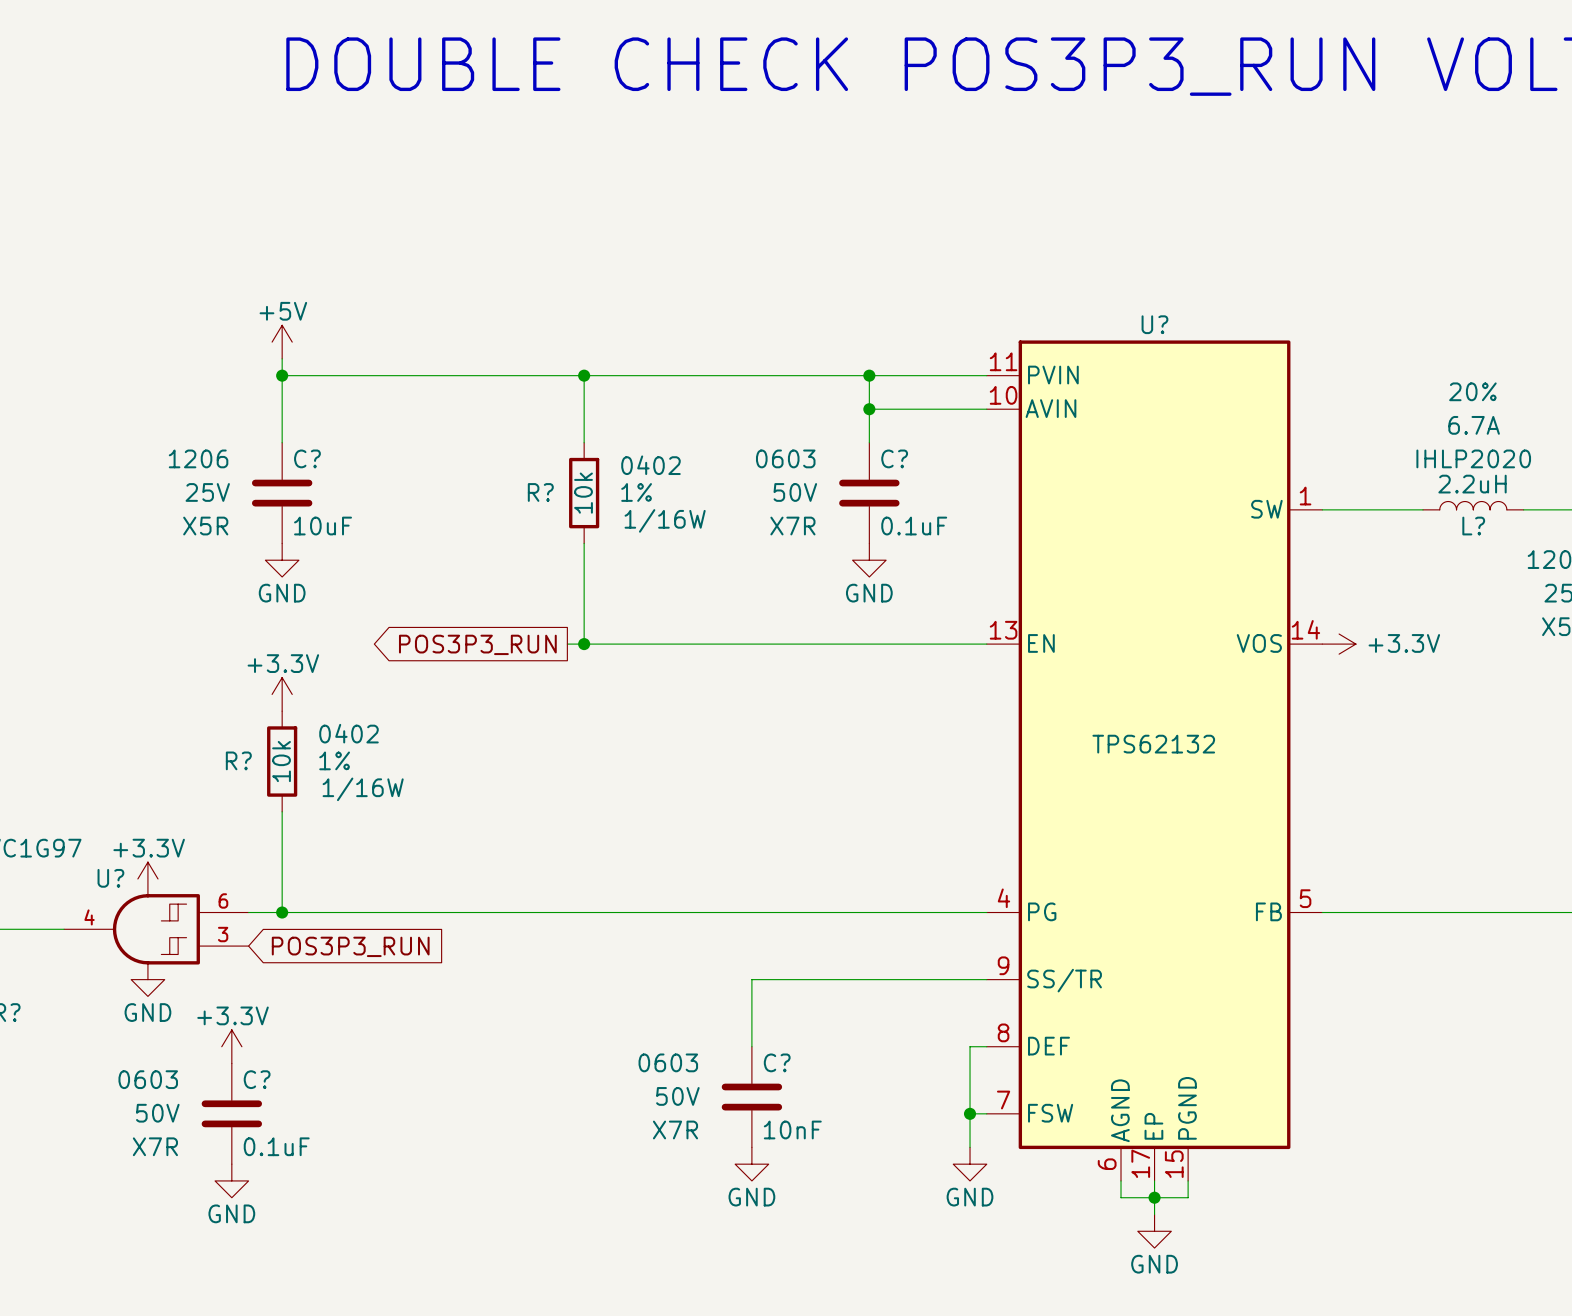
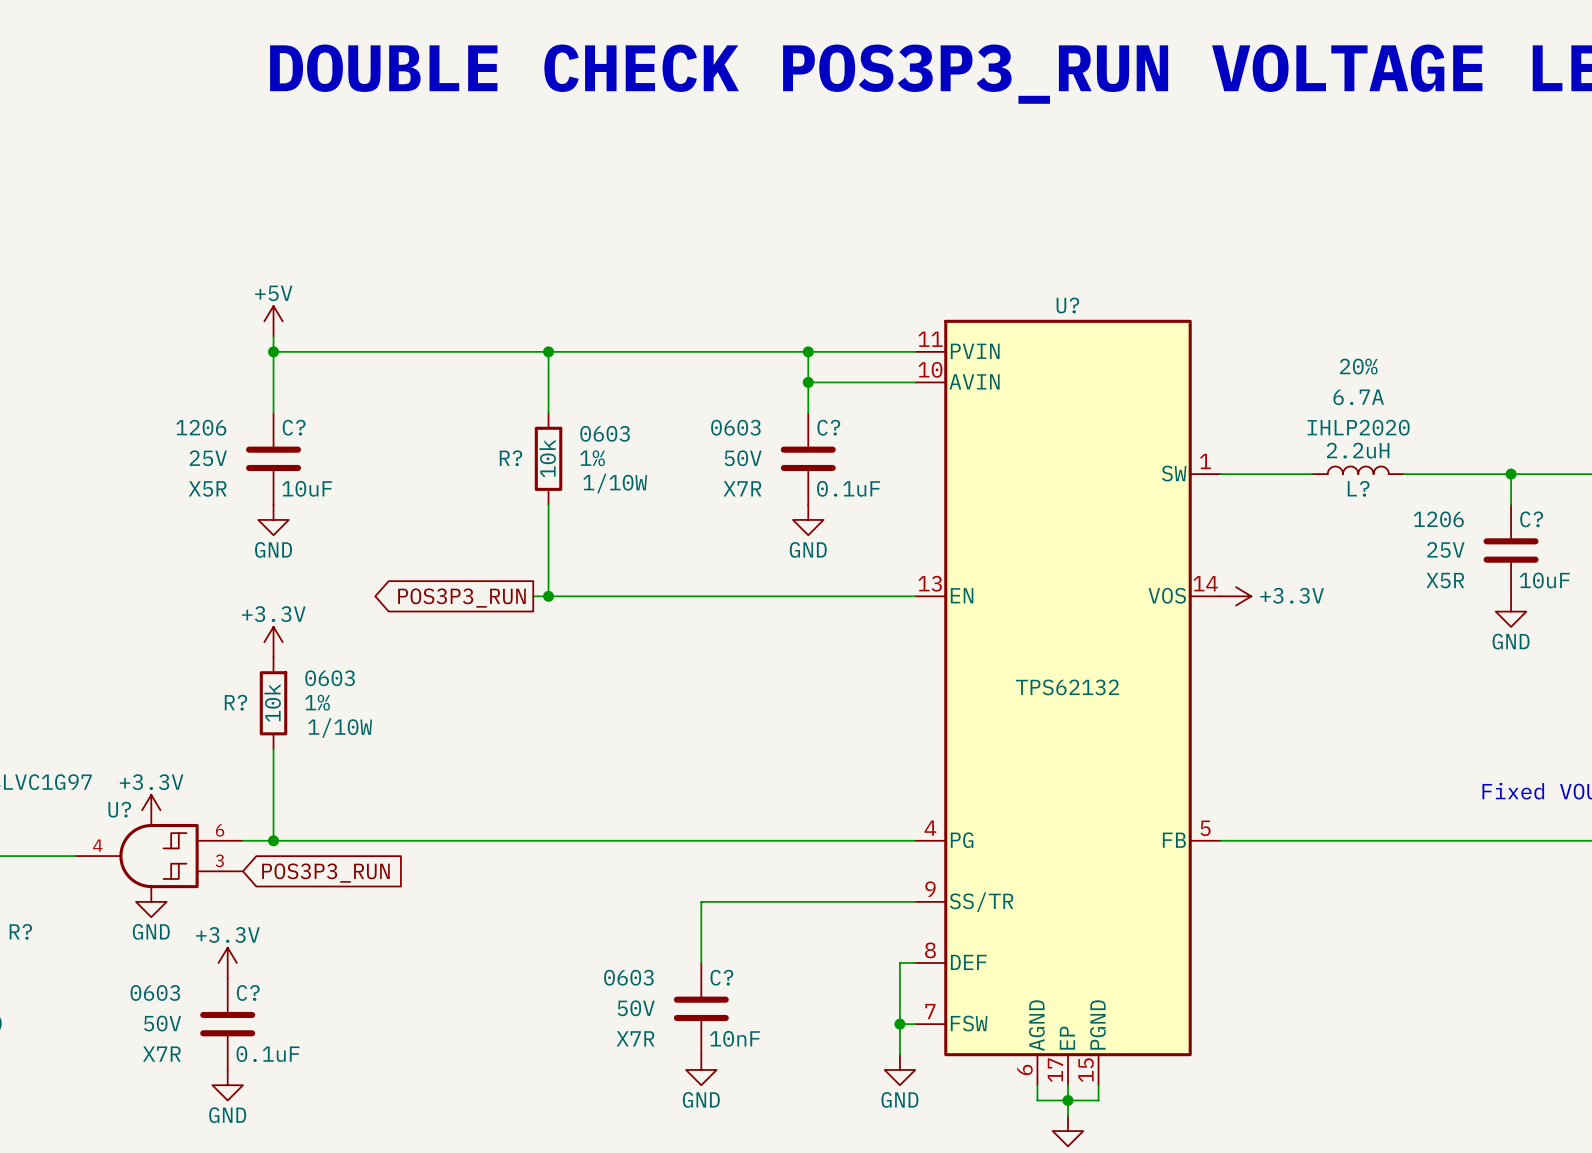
R? text: 0402 (650, 465) -> 0603 (605, 433)
R? text: 1/16W (665, 520) -> 1/10W (615, 483)
R? text: 0402 (348, 733) -> 0603 (330, 678)
R? text: 1/16W (363, 789) -> 1/10W (340, 727)

